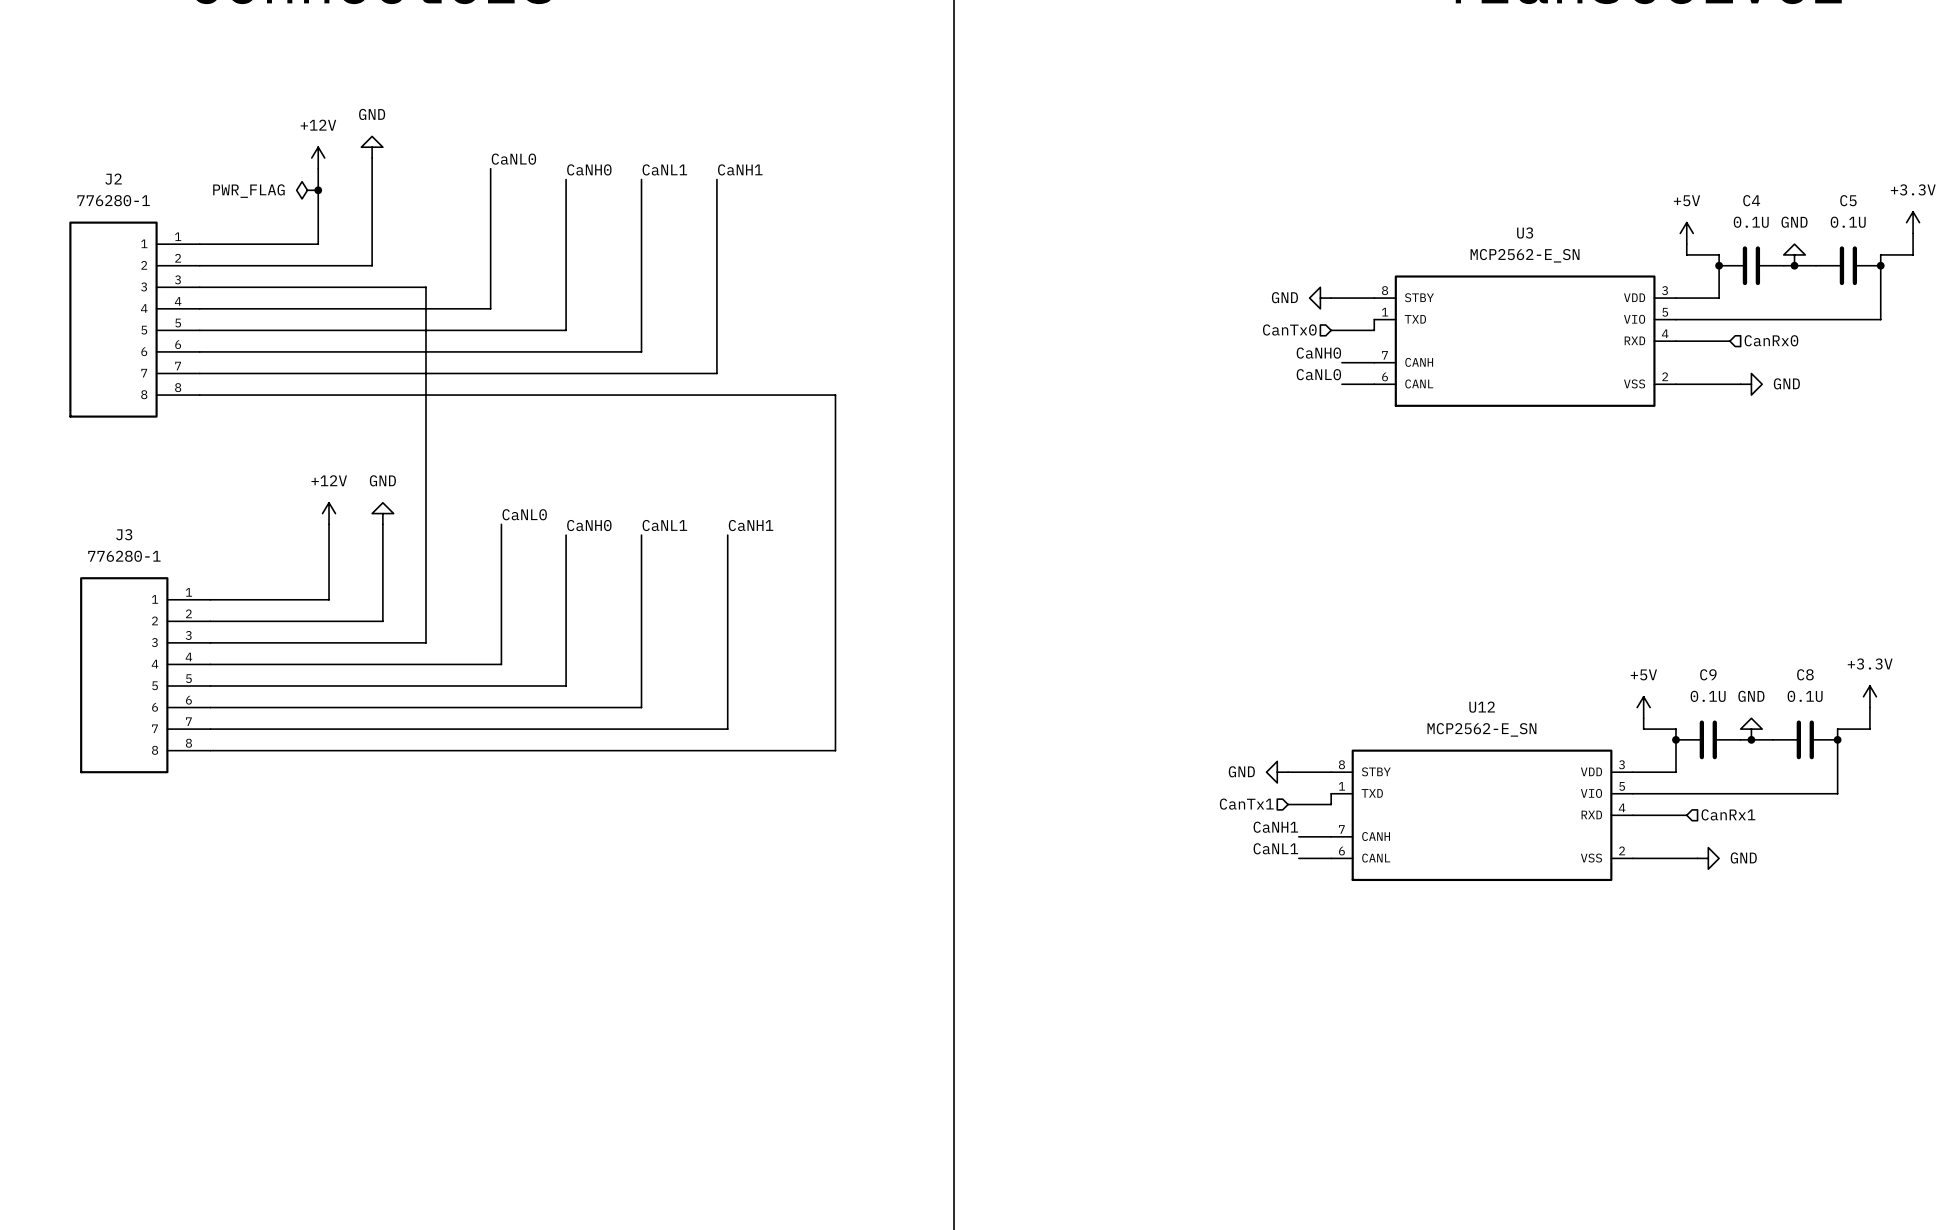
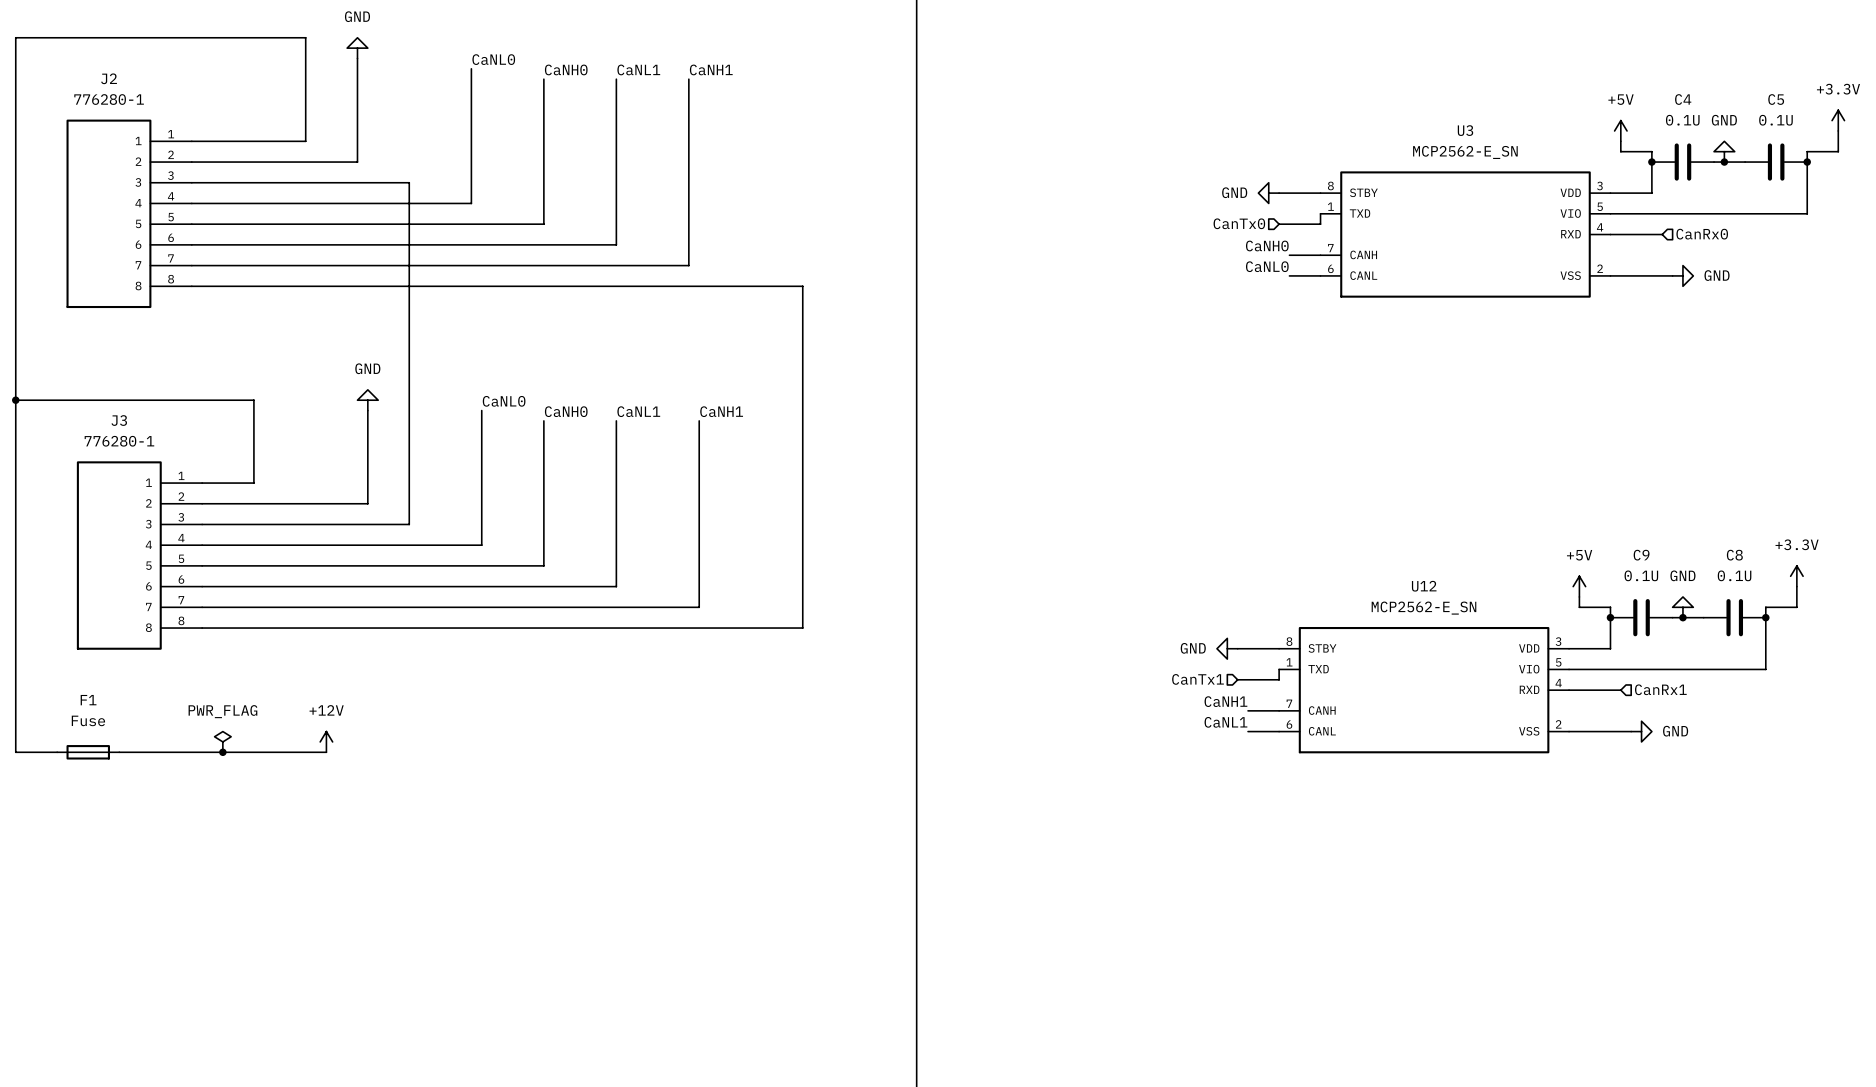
power symbol: +12V (318, 157) -> none
wire: none -> (305, 68) (305, 37) (15, 37) (15, 752) (57, 752)
power symbol: PWR_FLAG (307, 190) -> none
junction: (318, 190) -> none
junction: none -> (15, 400)
power symbol: +12V (329, 513) -> none
wire: (329, 524) (329, 599) (264, 599) -> (15, 400) (253, 400) (253, 483)
power symbol: none -> PWR_FLAG (222, 741)
power symbol: none -> +12V (326, 741)
F1: none -> Fuse (88, 752)
wire: none -> (119, 752) (326, 752)
junction: none -> (222, 752)

